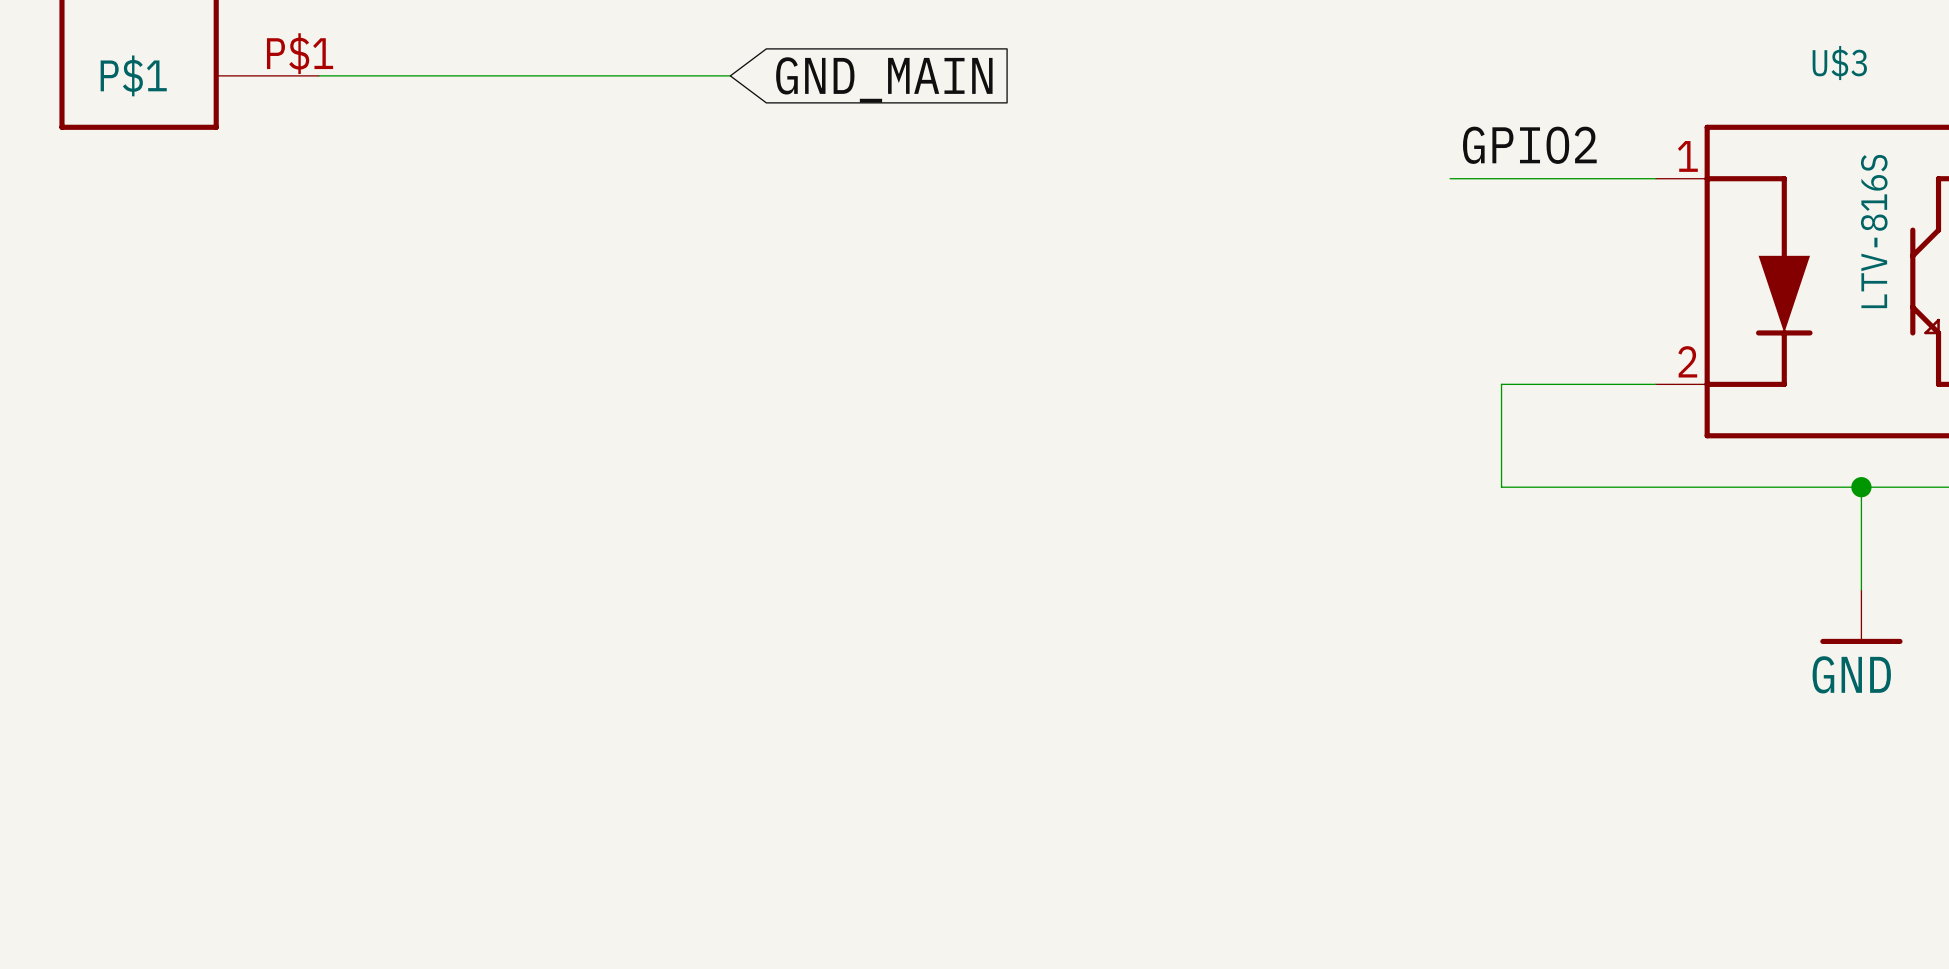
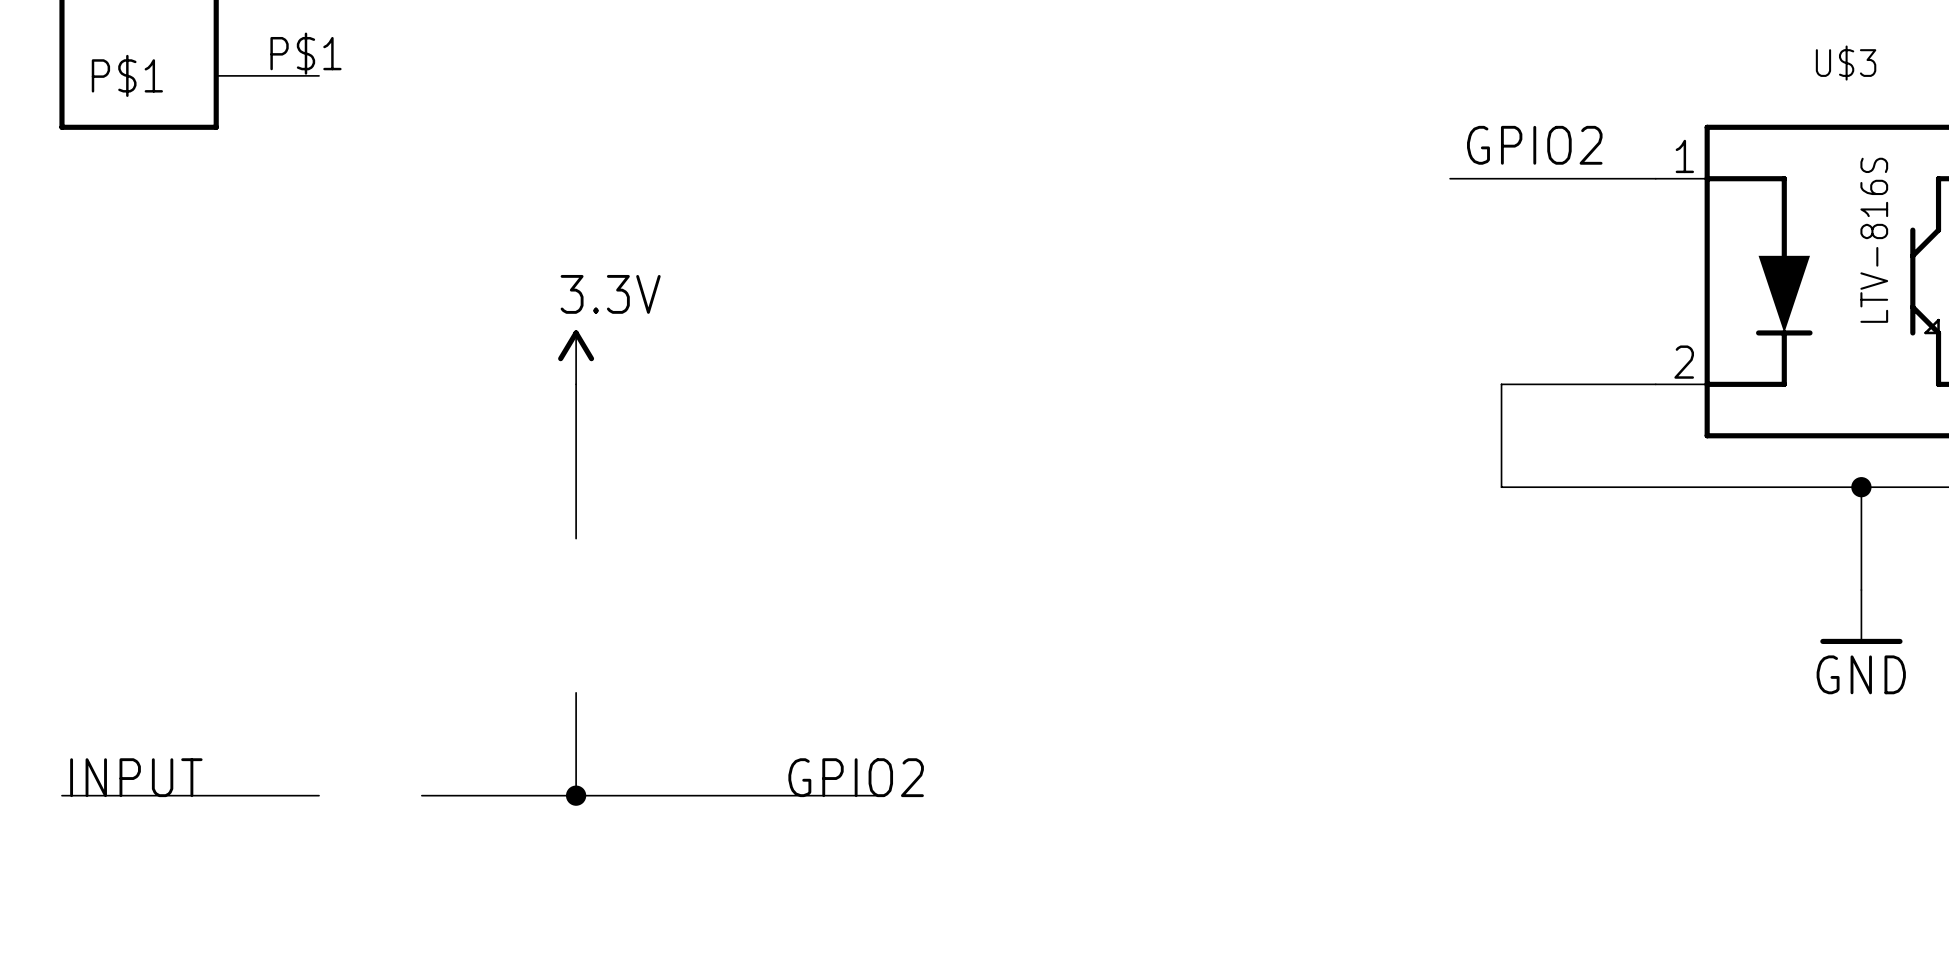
wire: (319, 75) (730, 75) -> none
global label: GND_MAIN (884, 79) -> none
power symbol: none -> 3.3V (576, 357)
wire: none -> (576, 384) (576, 538)
wire: none -> (576, 692) (576, 795)
label: none -> INPUT (136, 777)
label: none -> GPIO2 (856, 777)
wire: none -> (61, 795) (319, 795)
wire: none -> (421, 795) (884, 795)
junction: none -> (576, 795)

